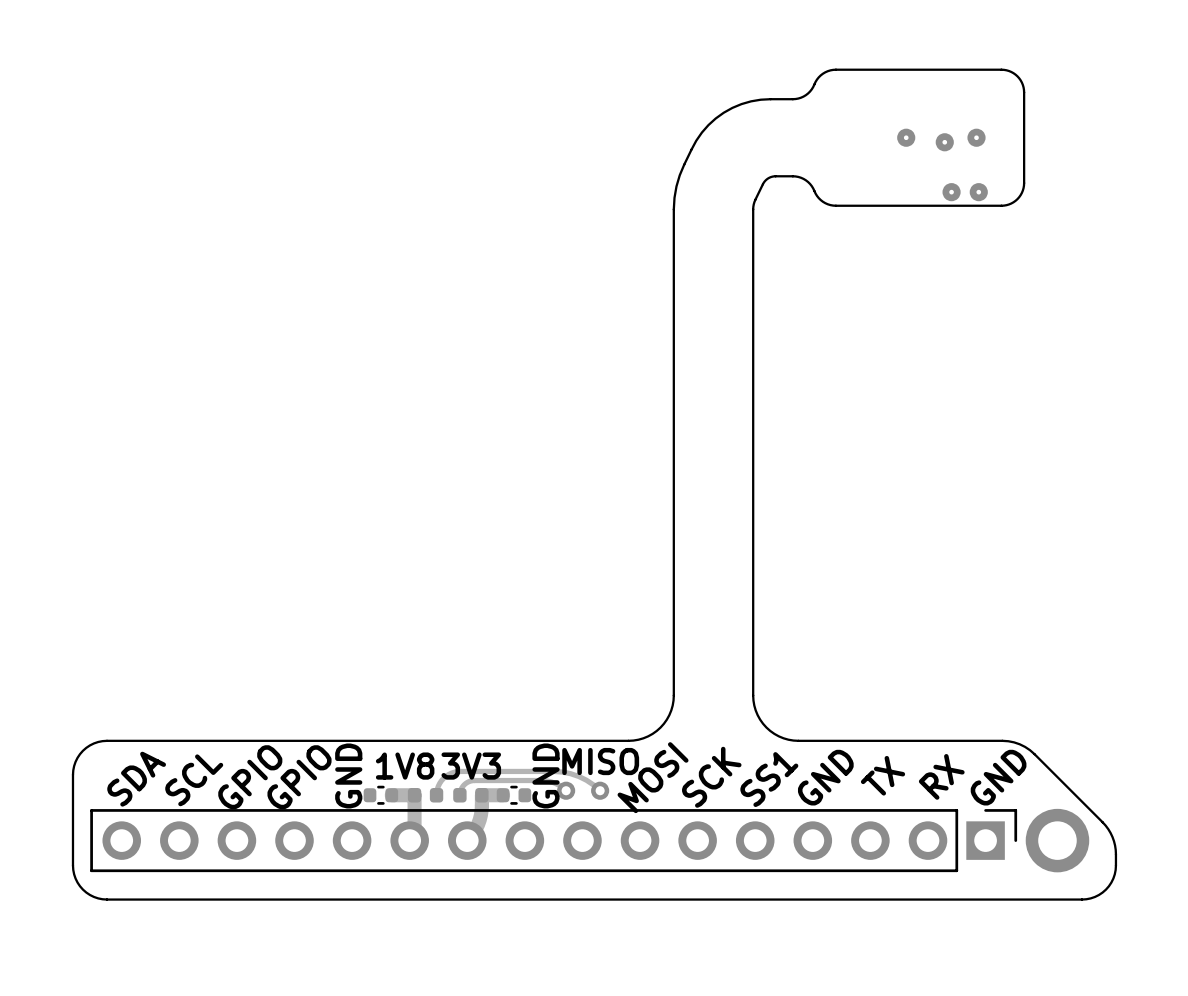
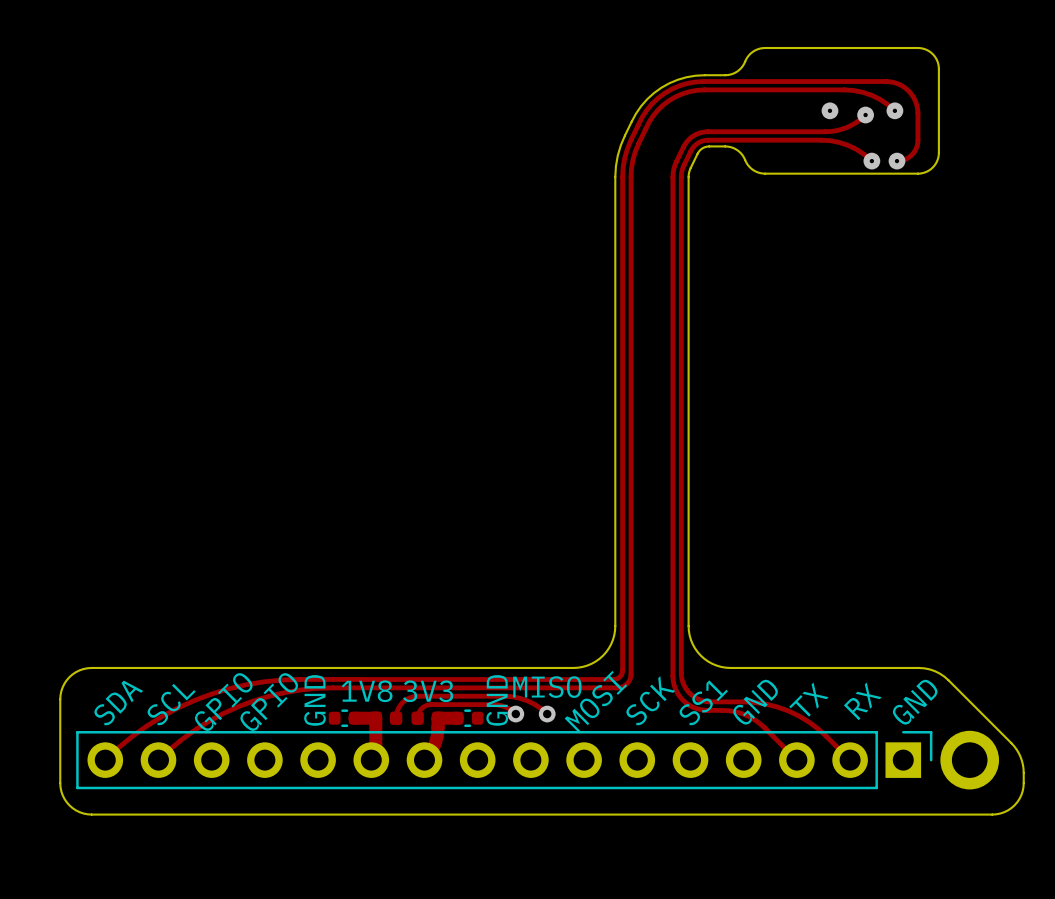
track: none -> (894, 110) (880, 99) (853, 90) (697, 90) (682, 93) (663, 105) (649, 122) (638, 143) (632, 159) (631, 177) (631, 674) (625, 684) (617, 687) (332, 687) (300, 689) (253, 700) (223, 713) (182, 738) (158, 760)
track: none -> (865, 115) (852, 125) (830, 131) (698, 133) (690, 137) (684, 144) (673, 173) (673, 683) (680, 697) (692, 706) (703, 710) (734, 711) (755, 720) (796, 760)
track: none -> (871, 161) (857, 149) (830, 140) (706, 140) (698, 143) (691, 149) (682, 168) (681, 177) (681, 672) (682, 682) (692, 695) (703, 701) (754, 702) (788, 710) (817, 728) (850, 760)
track: none -> (897, 161) (910, 156) (916, 147) (917, 109) (913, 97) (908, 90) (898, 83) (890, 81) (695, 81) (679, 85) (664, 93) (651, 104) (641, 117) (627, 148) (622, 176) (622, 670) (619, 677) (613, 679) (300, 679) (264, 681) (211, 694) (178, 707) (132, 736) (105, 760)

